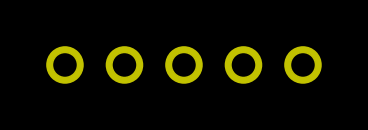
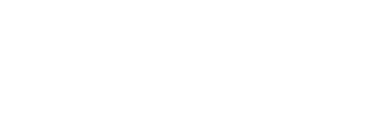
part: (64, 64) -> none
part: (124, 64) -> none
part: (183, 64) -> none
part: (243, 64) -> none
part: (302, 64) -> none

